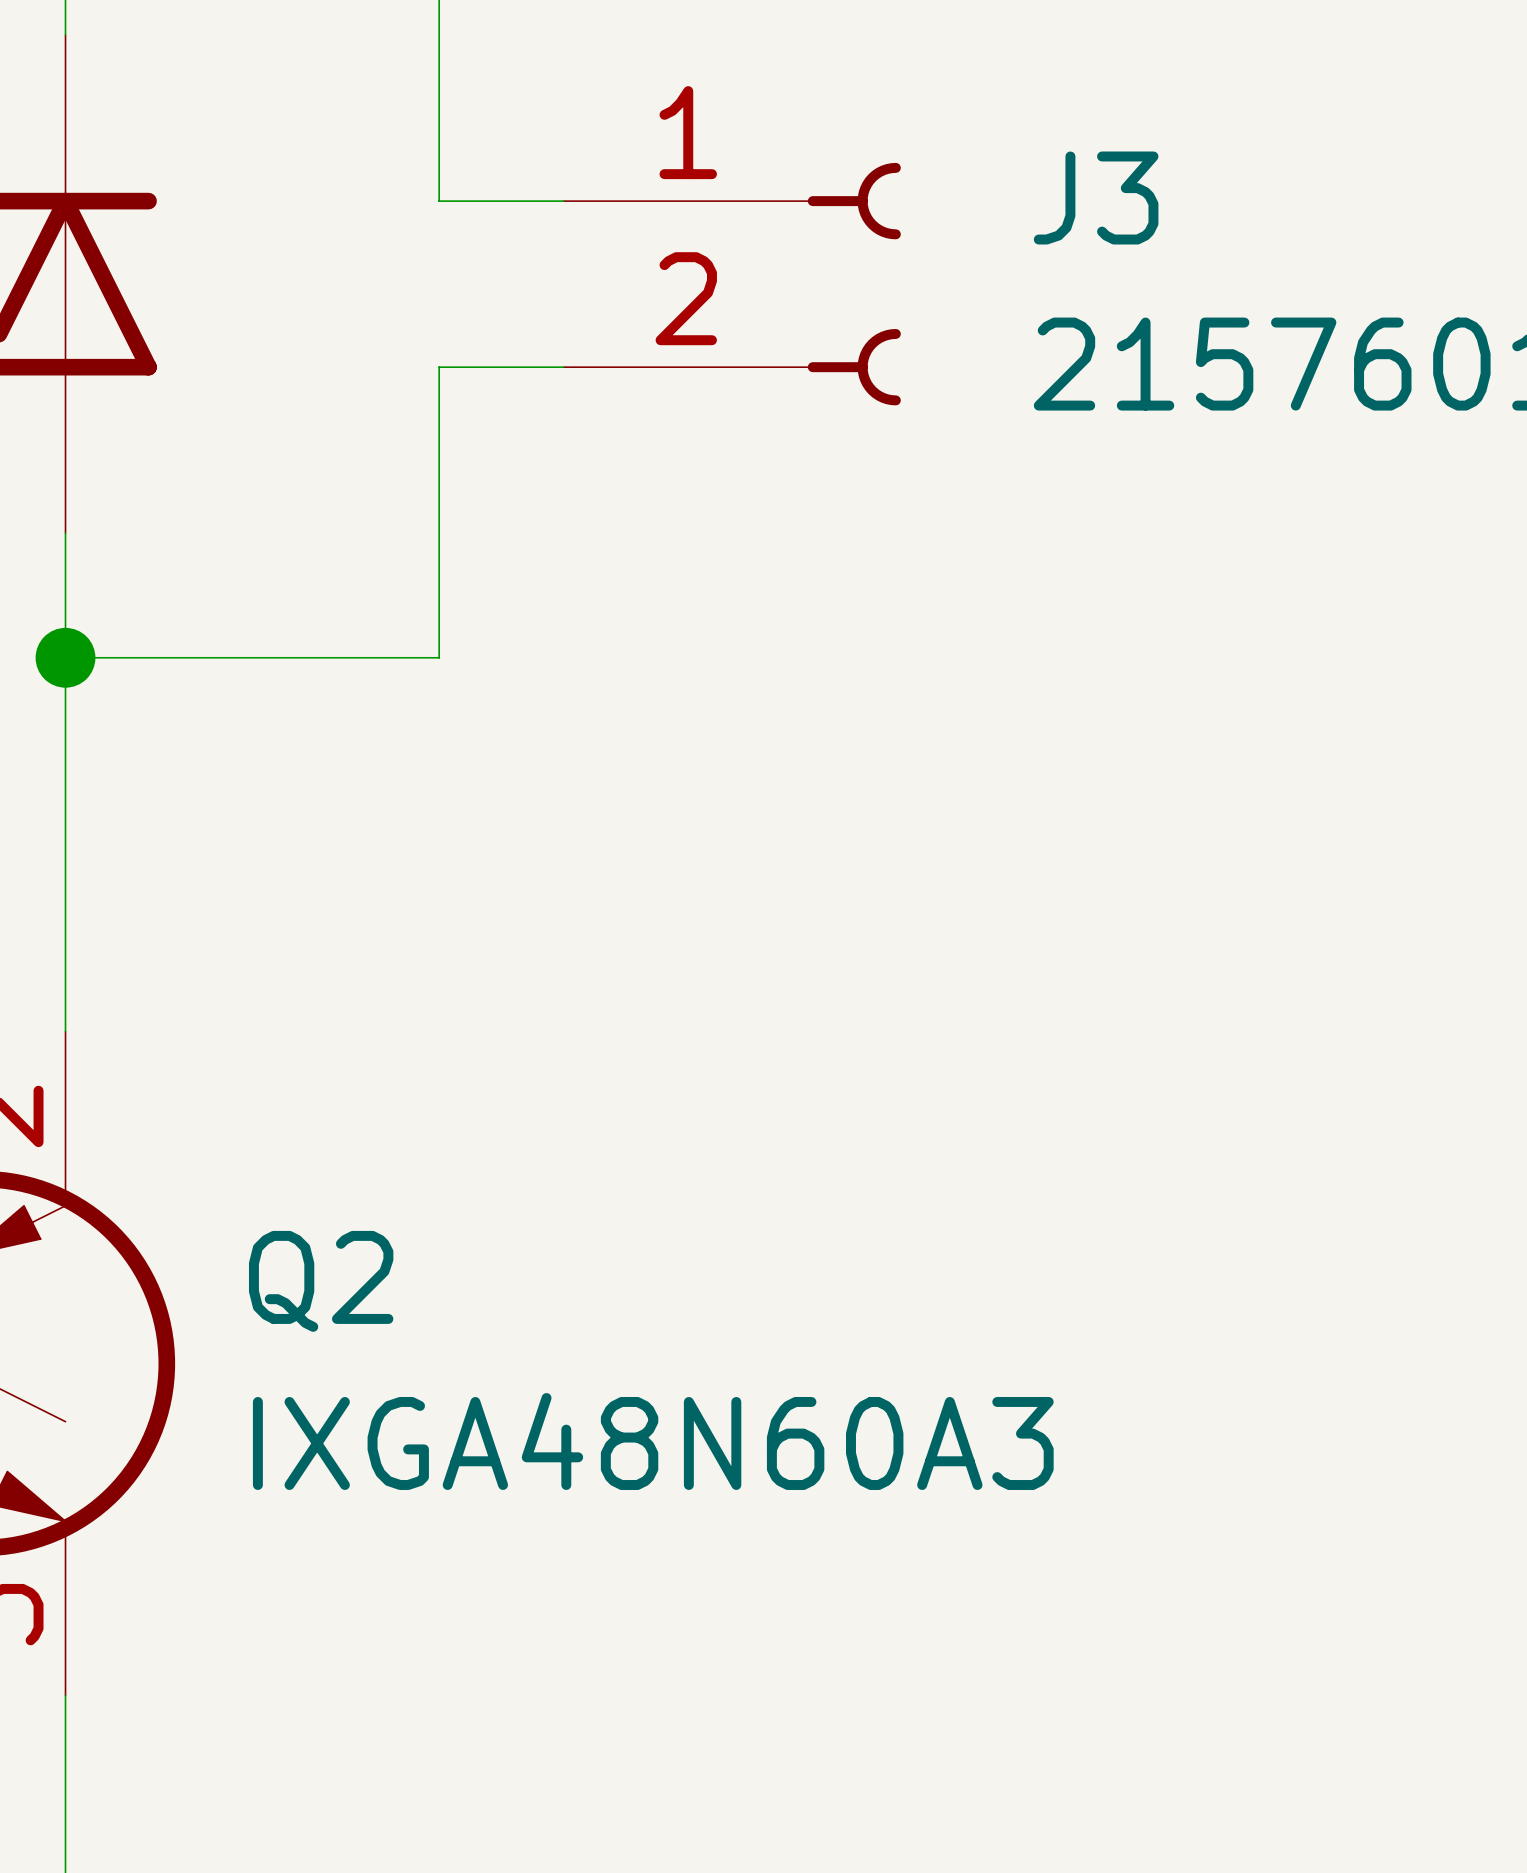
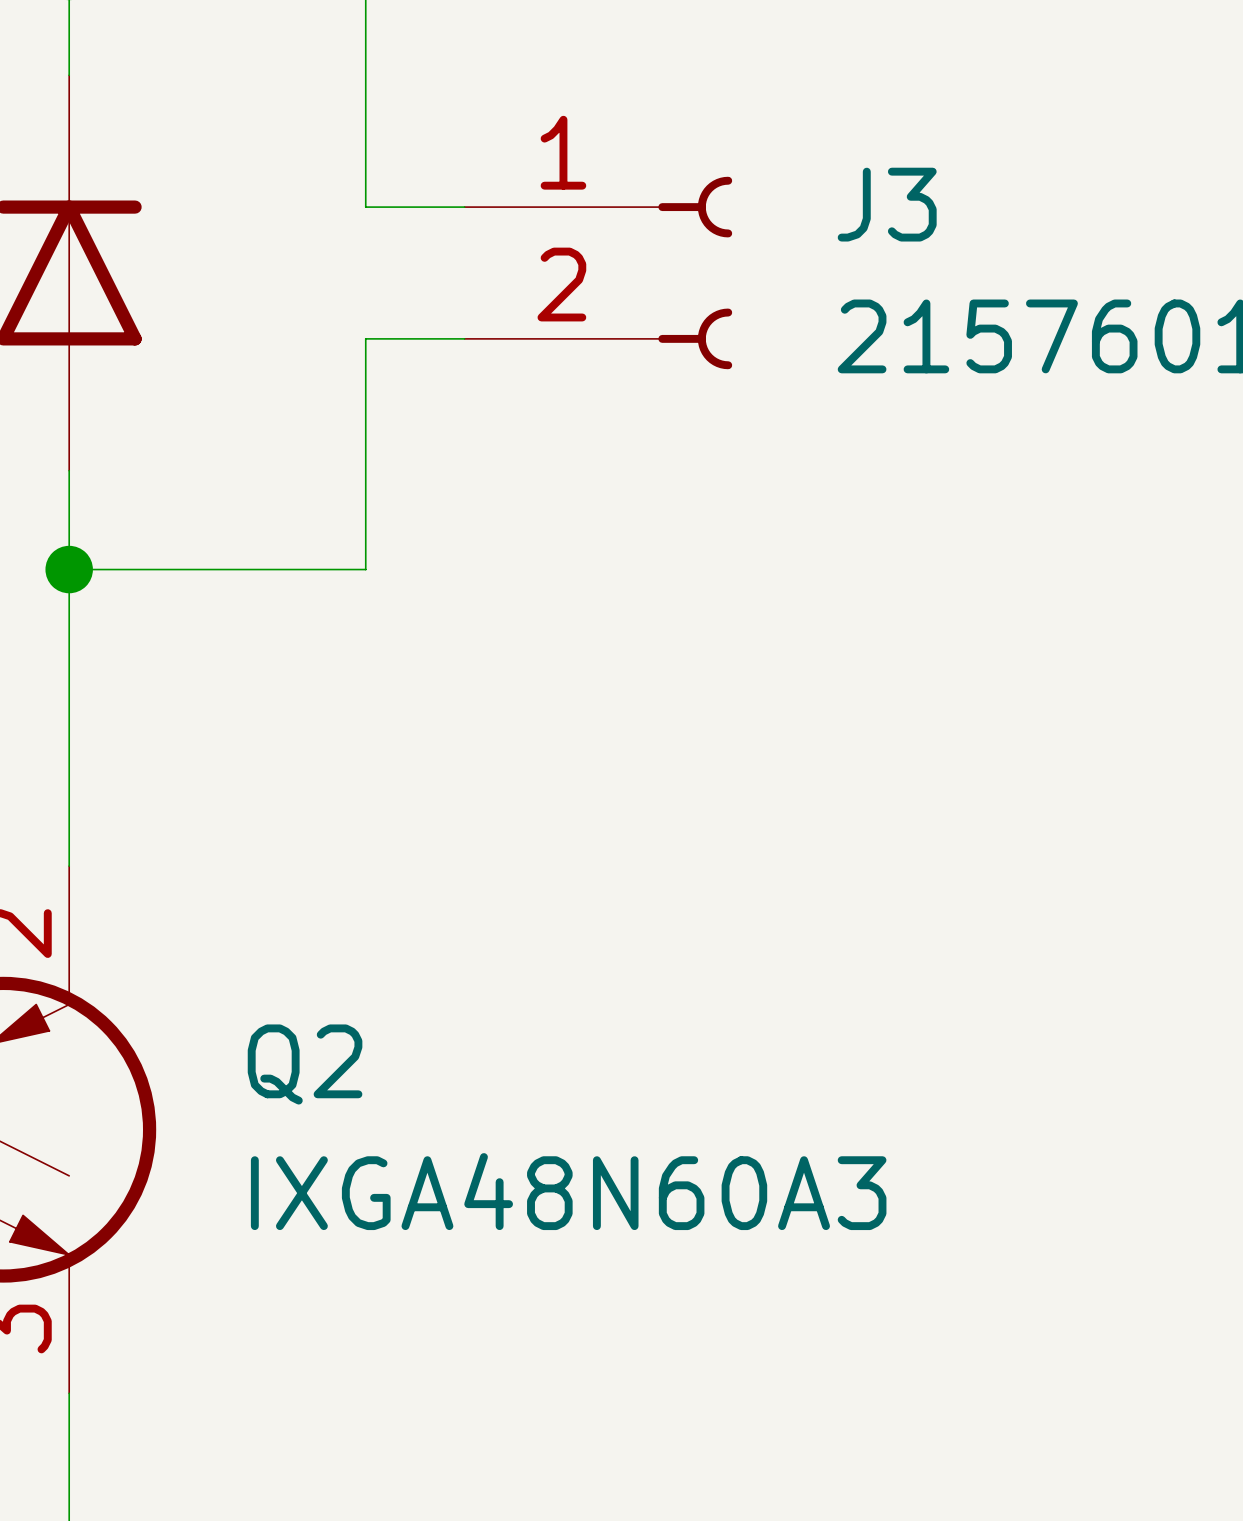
Q2 name position: Q2 (321, 1281) -> Q2 (305, 1064)
Q2 value position: IXGA48N60A3 (653, 1441) -> IXGA48N60A3 (568, 1191)

